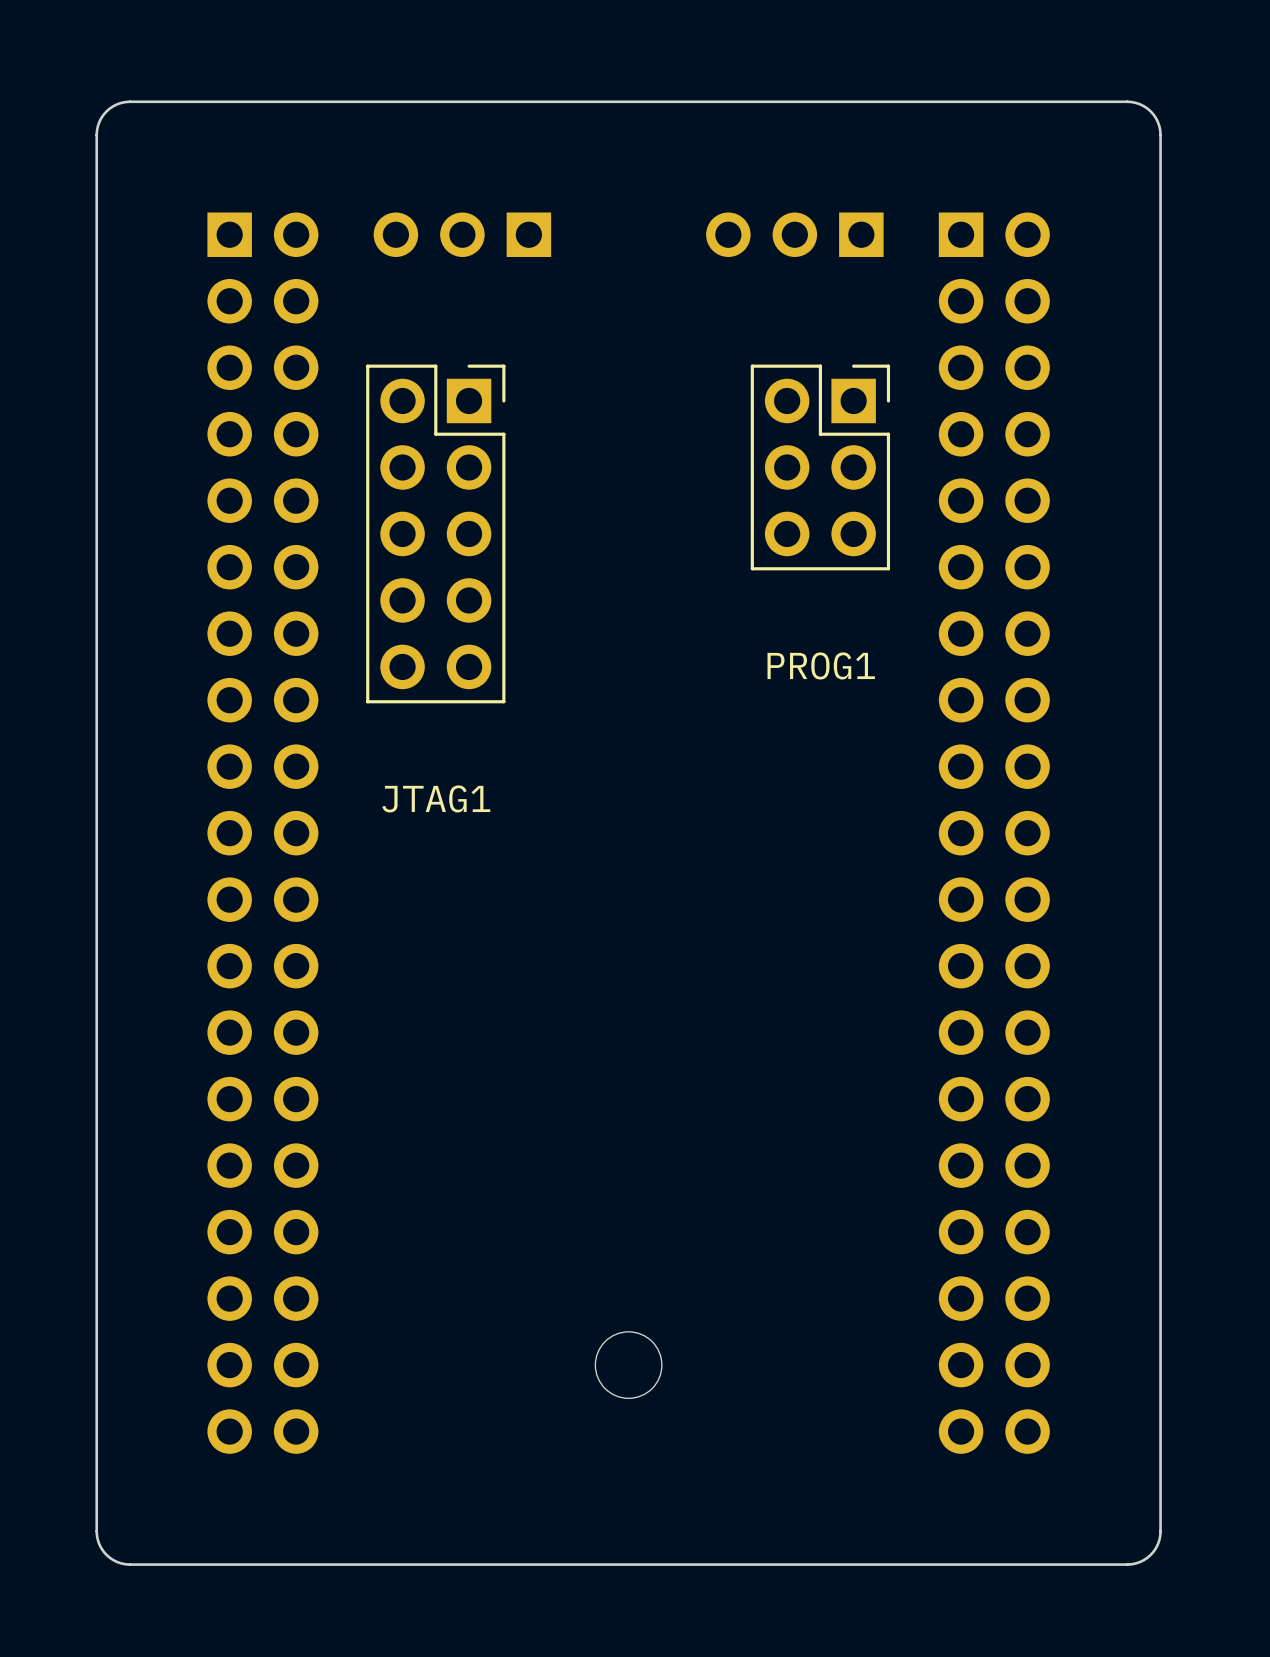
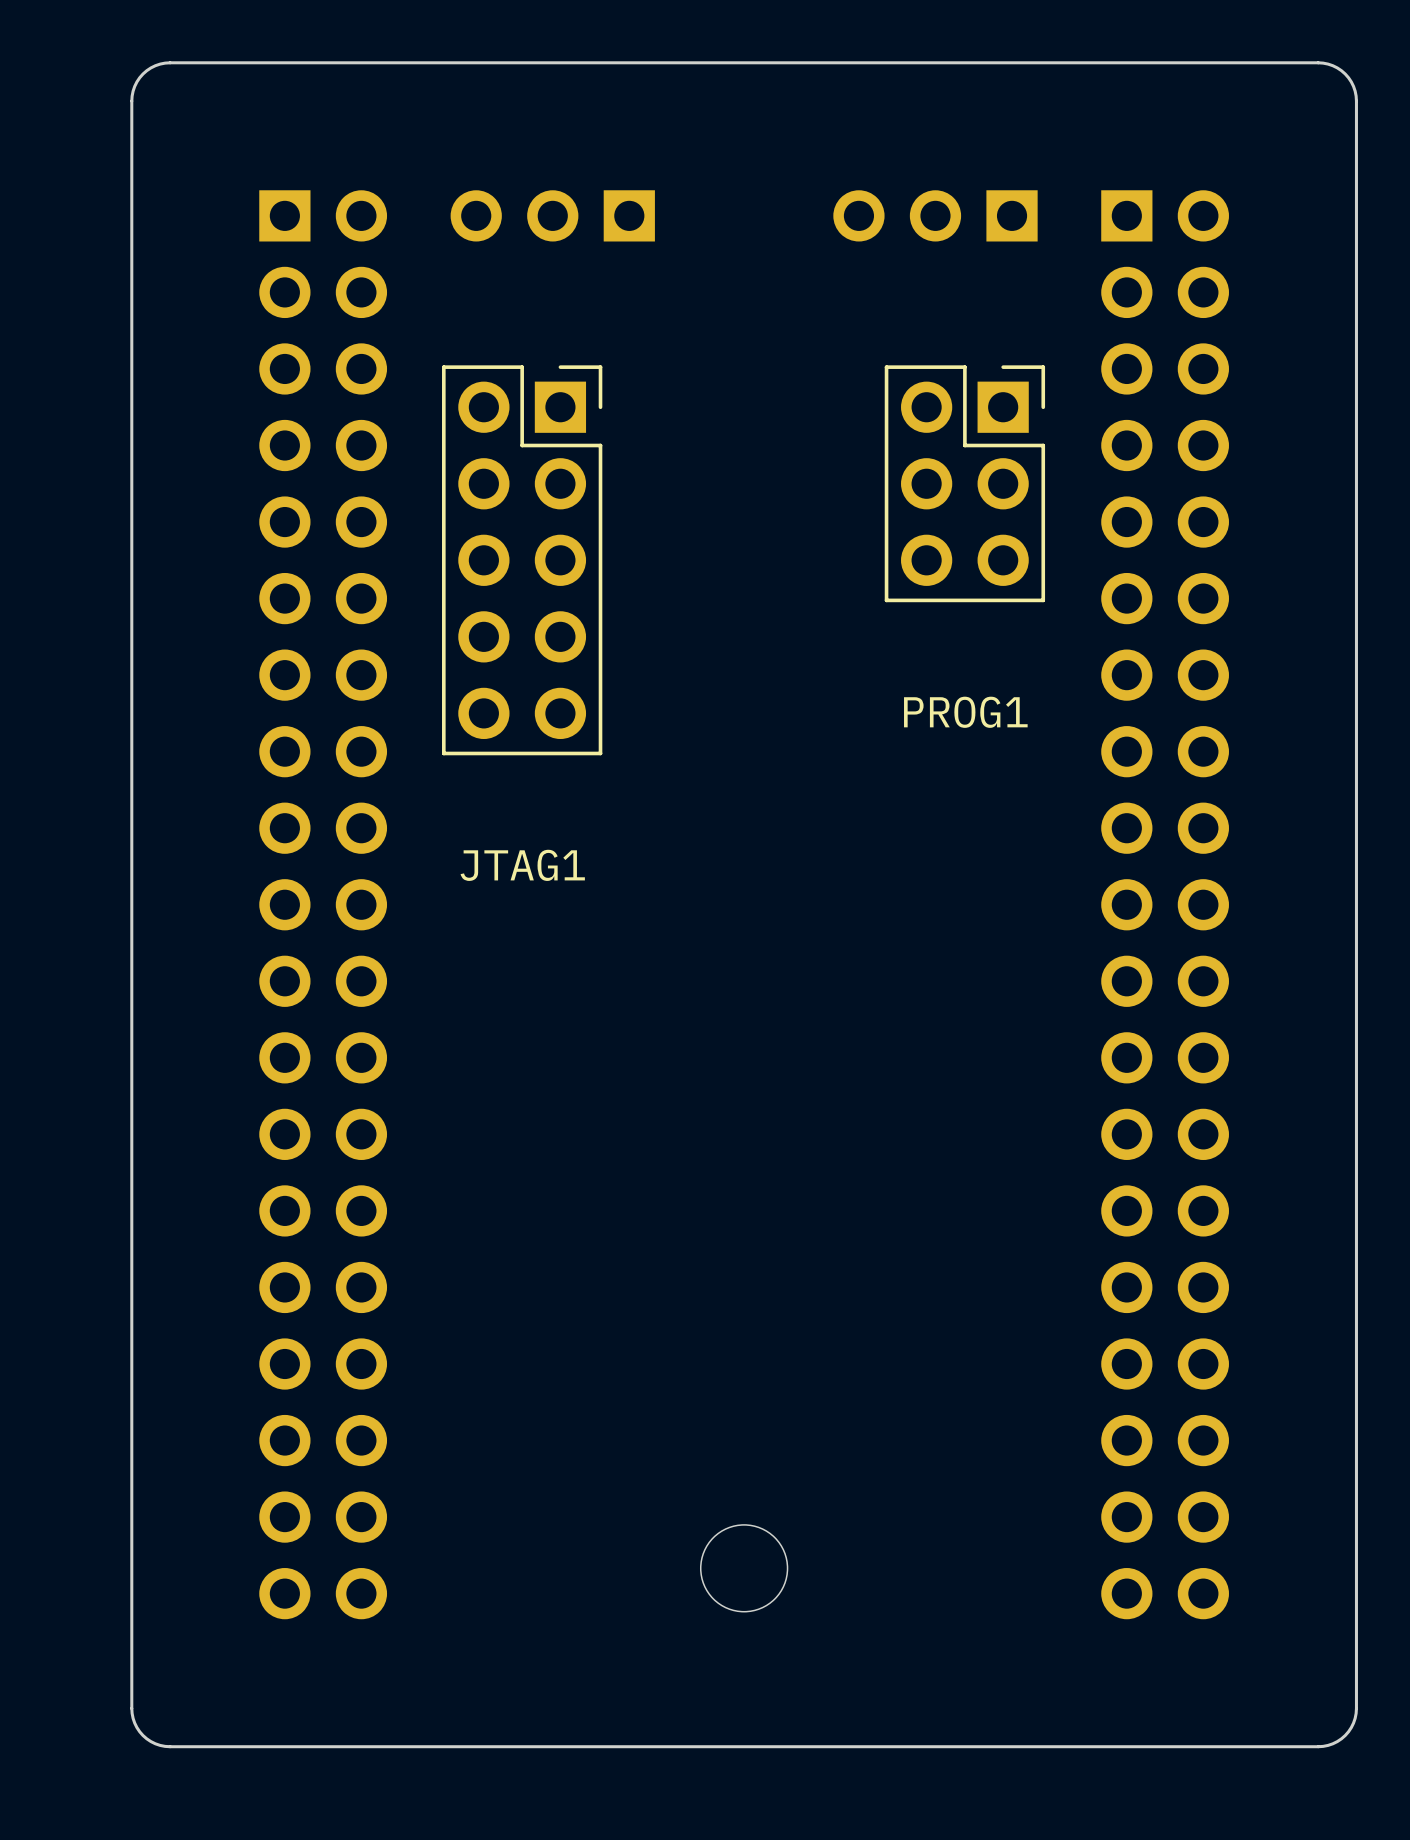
round board edge: [594, 1331, 663, 1399] -> none
round board edge: none -> [699, 1524, 789, 1613]

